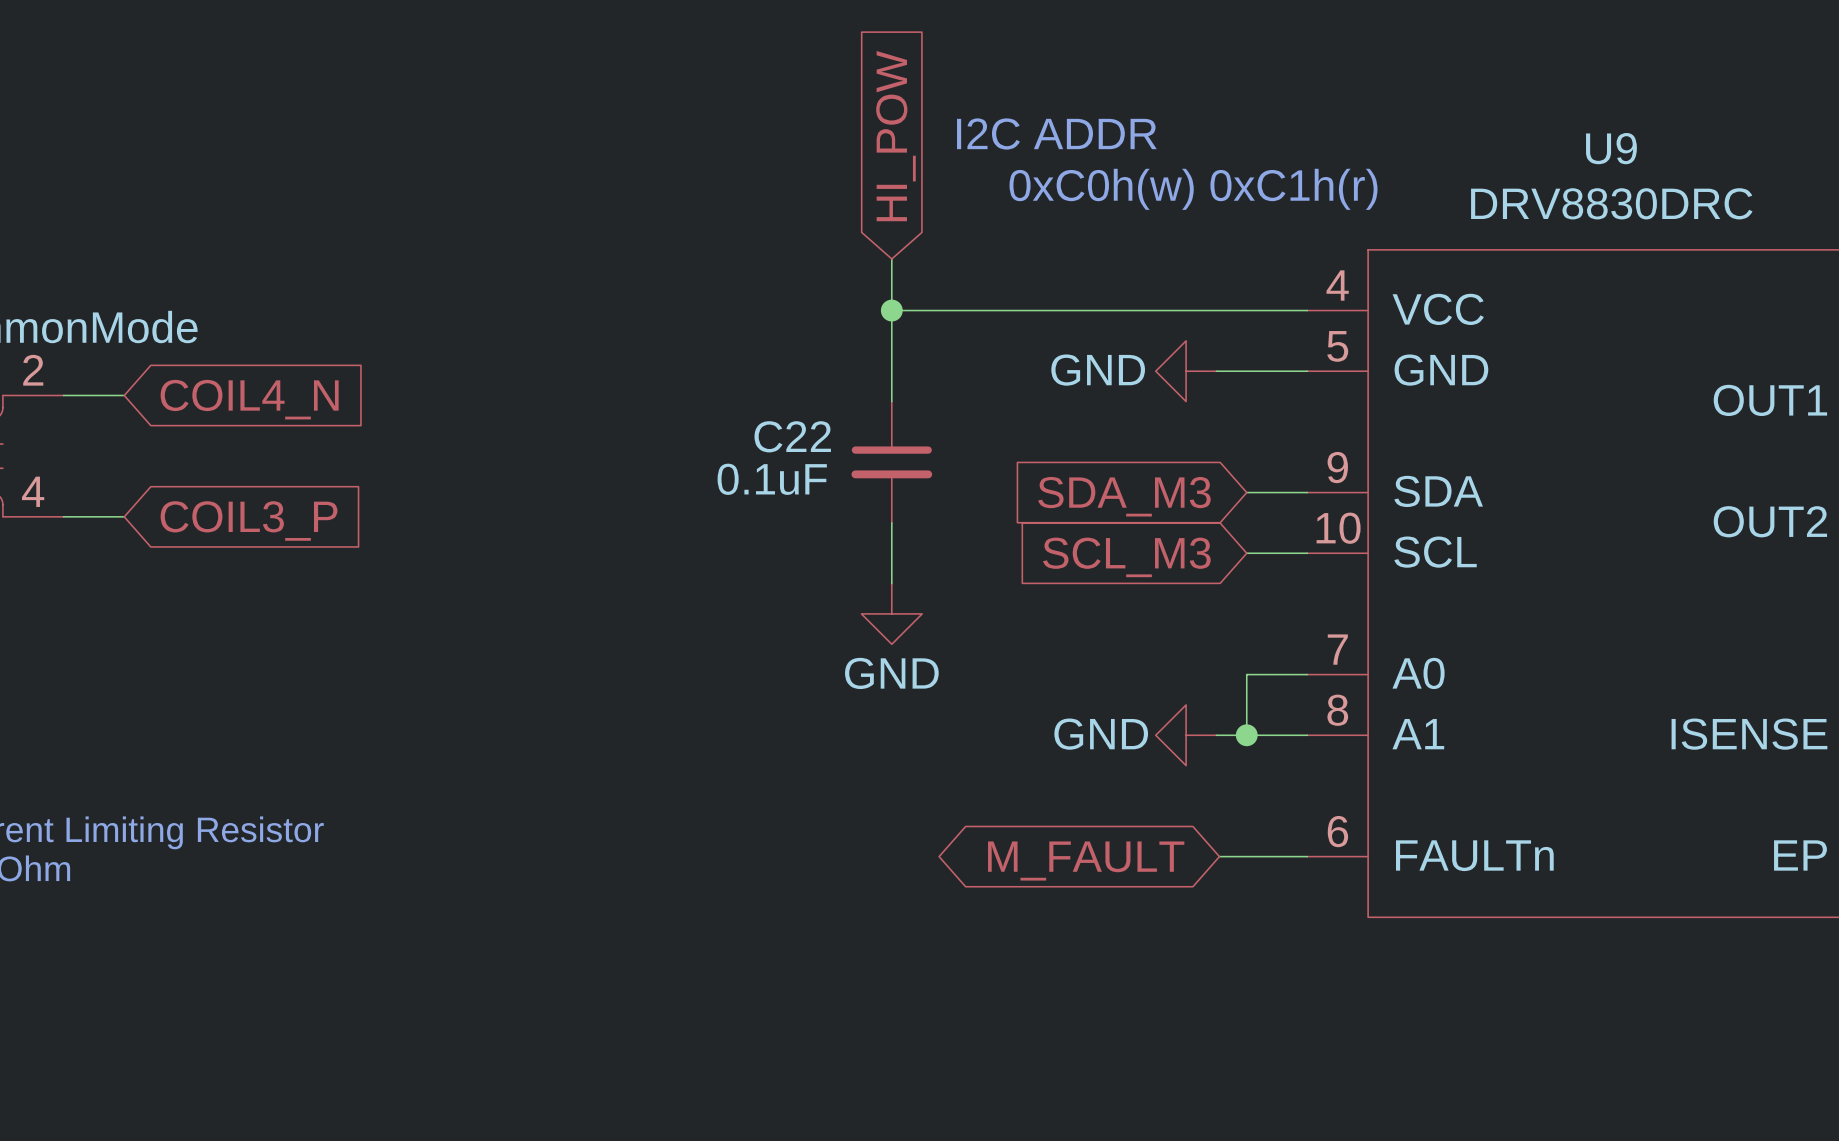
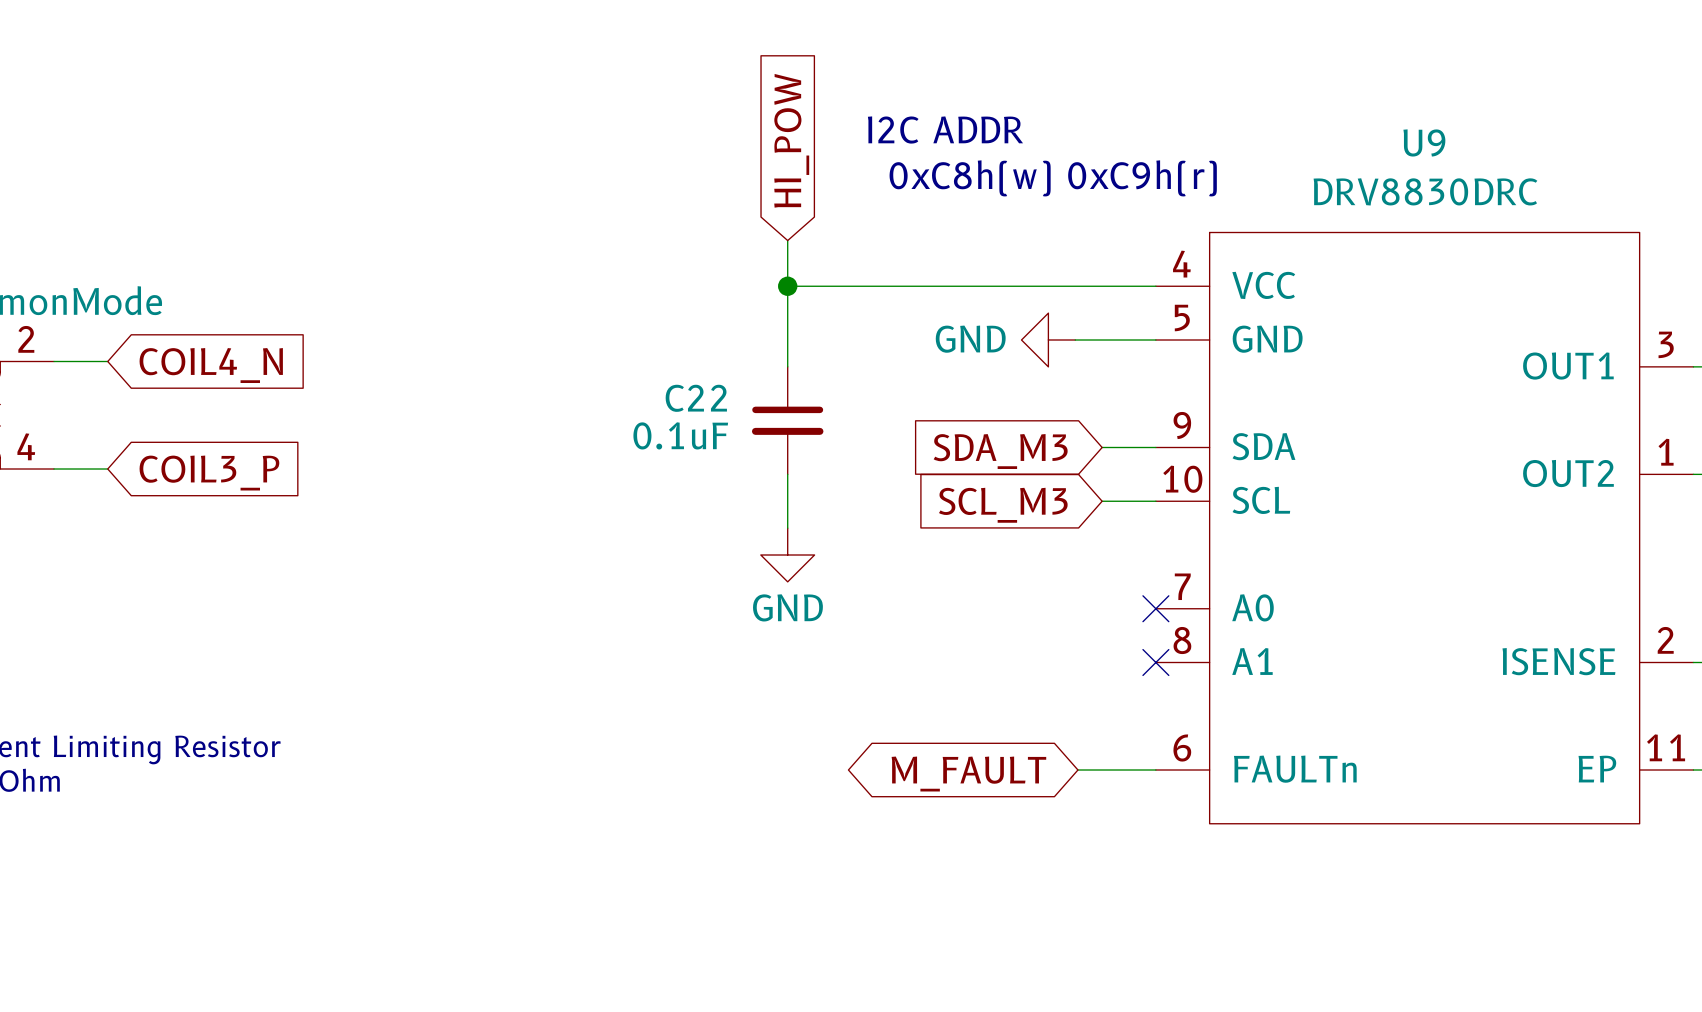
text: 0xC0h(w) 0xC1h(r) (1193, 189) -> 0xC8h(w) 0xC9h(r) (1053, 178)
wire: (1307, 674) (1246, 674) (1246, 735) -> none
no-connect mark: none -> (1155, 608)
power symbol: GND (1186, 735) -> none
wire: (1216, 735) (1307, 735) -> none
junction: (1246, 735) -> none
no-connect mark: none -> (1155, 662)

